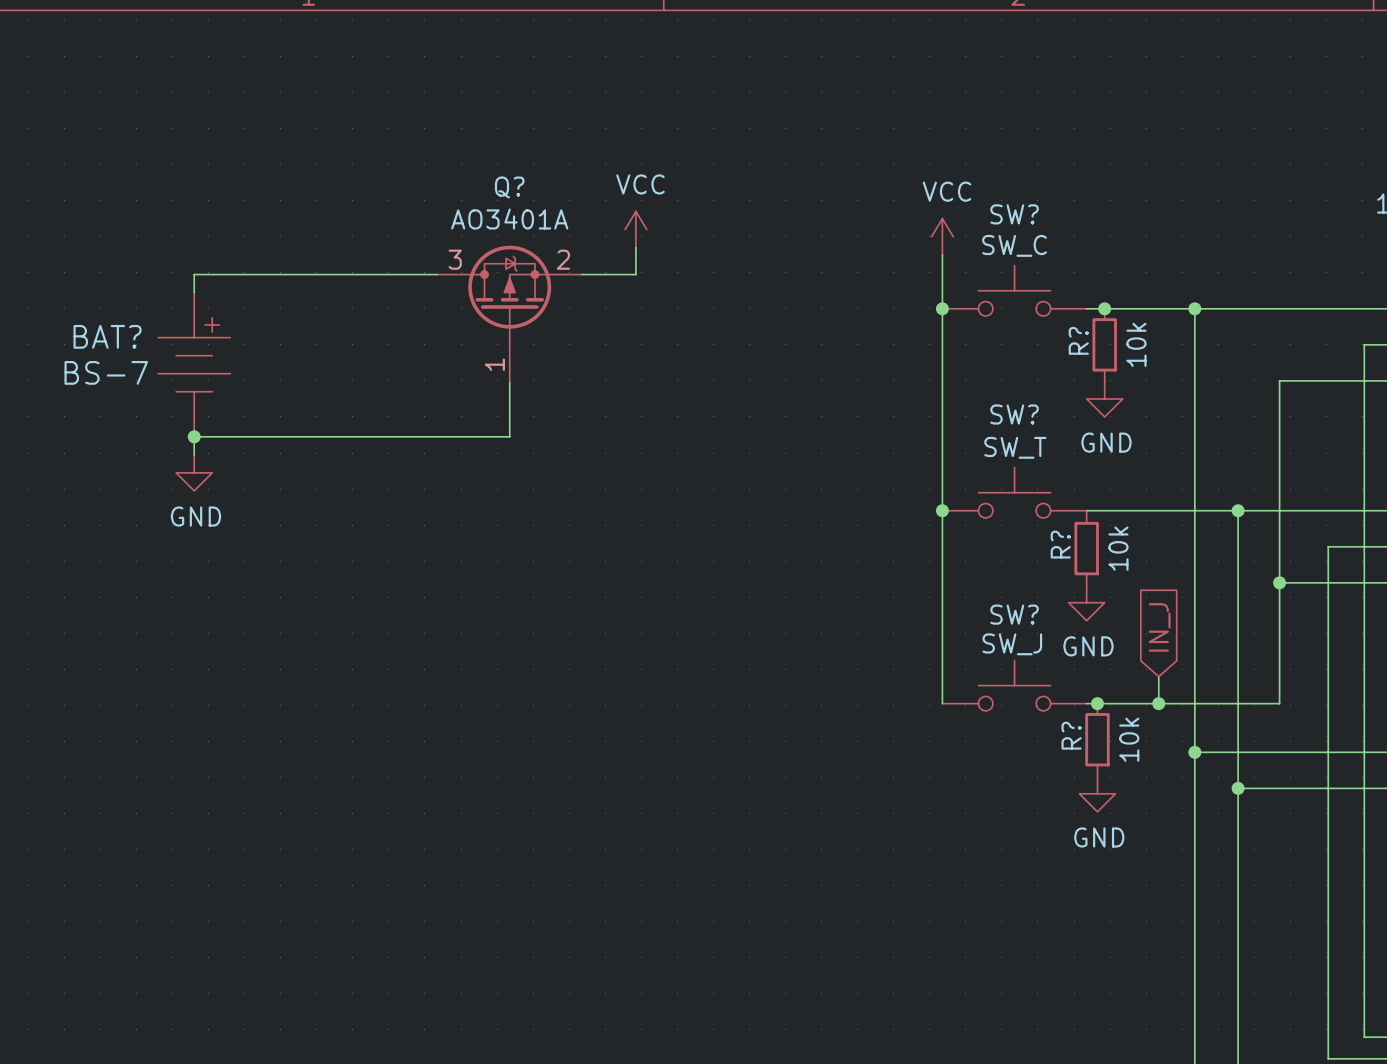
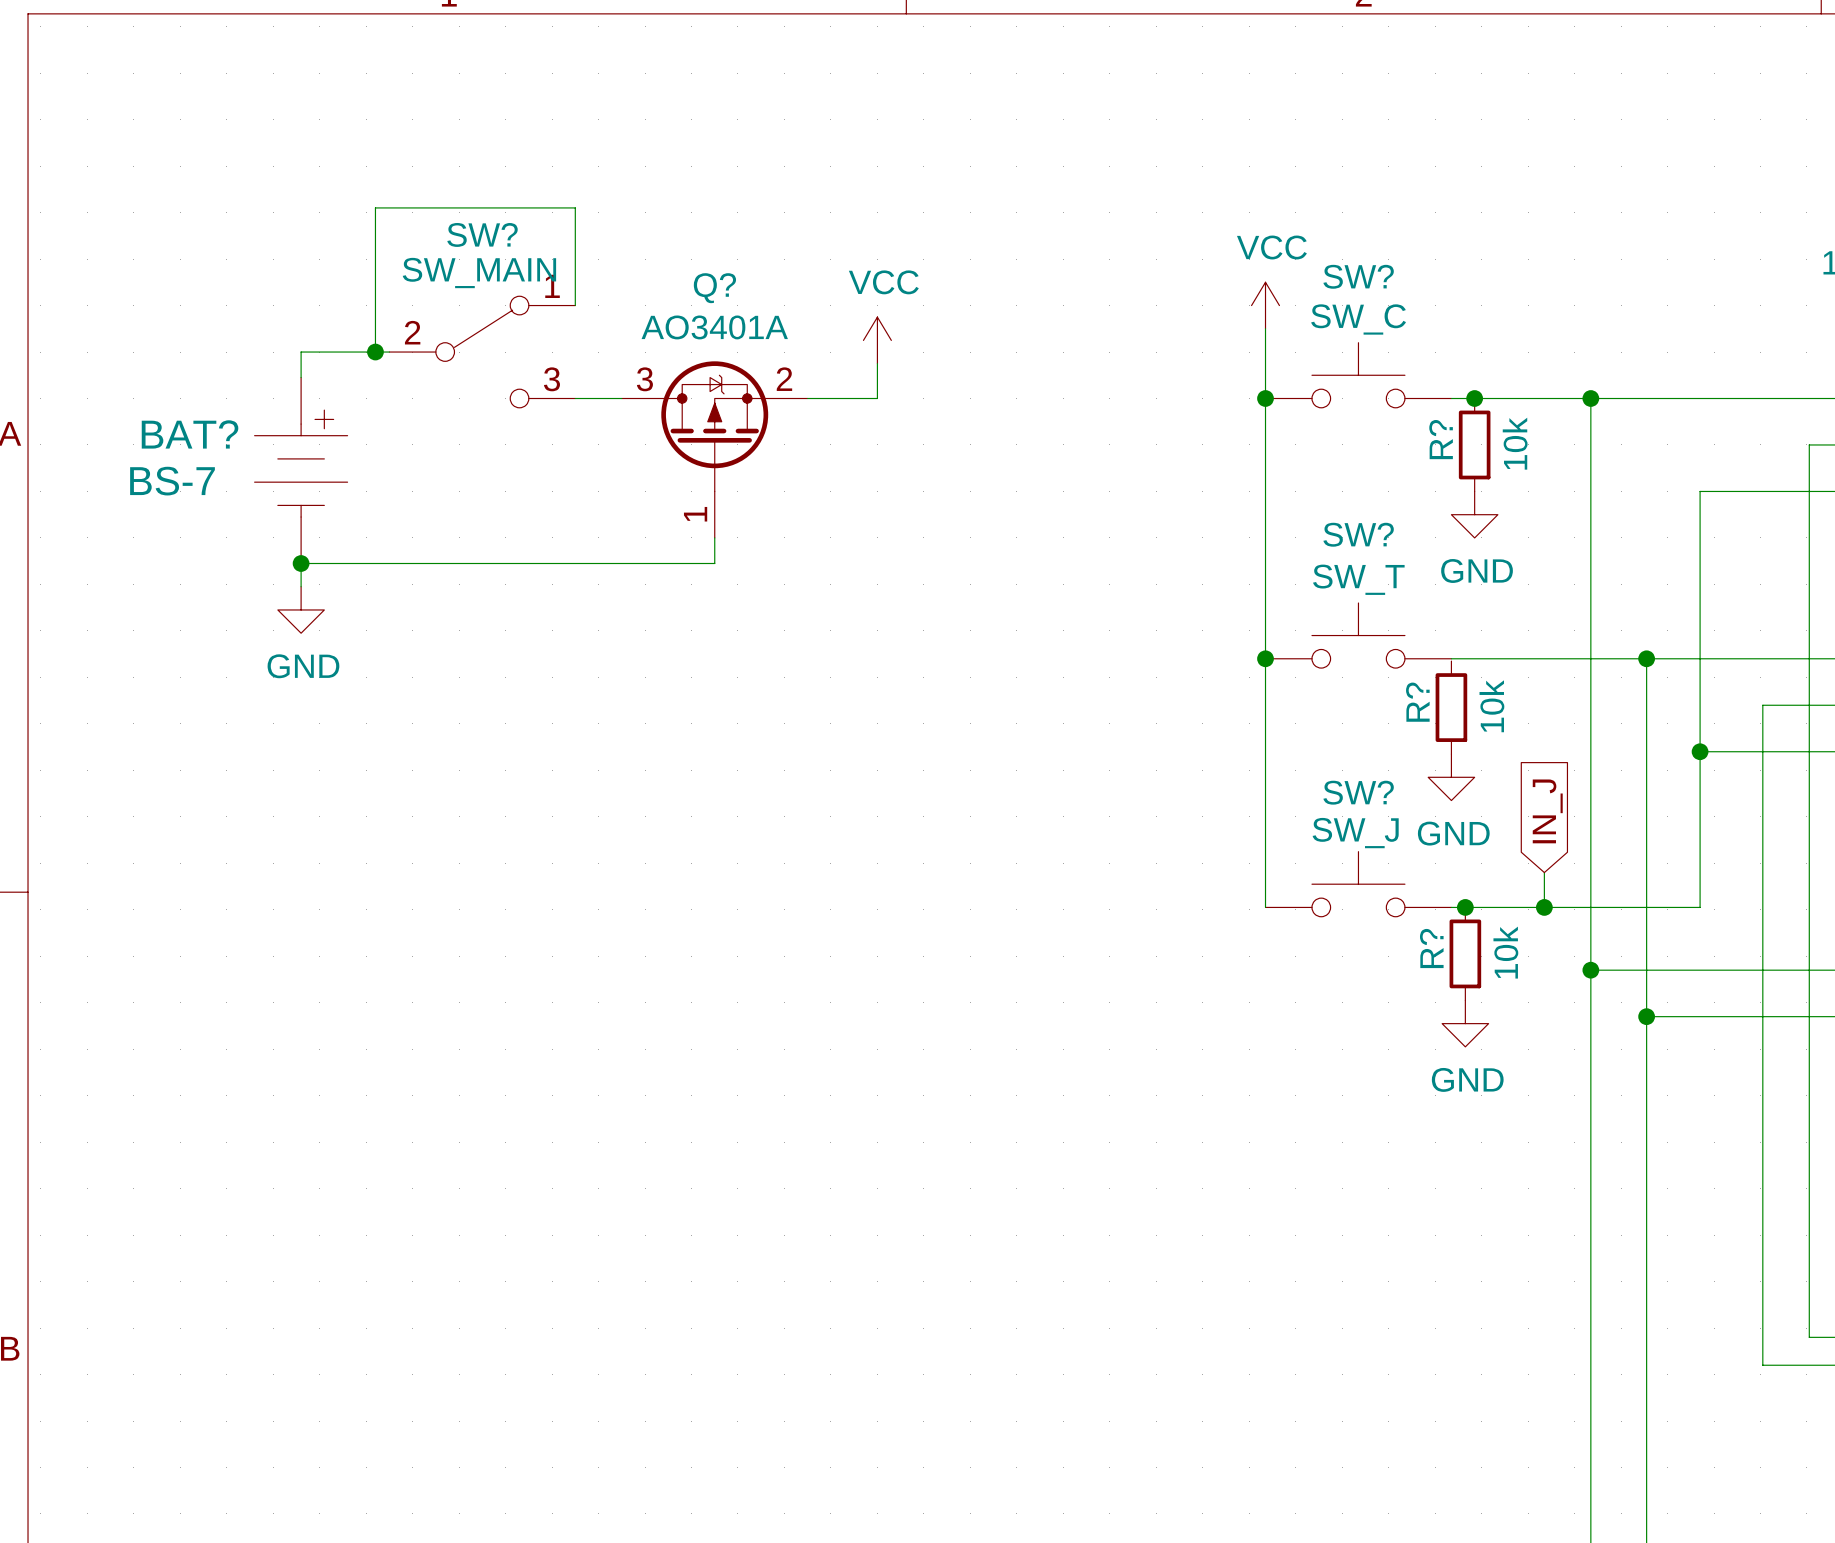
power symbol position: VCC (635, 229) -> VCC (877, 340)
wire: none -> (575, 305) (575, 207) (375, 207) (375, 352)
wire: (635, 247) (635, 274) (581, 274) -> (877, 363) (877, 398) (807, 398)
junction: none -> (375, 352)
SW?: none -> SW_MAIN (482, 352)
wire: (194, 274) (437, 274) -> (301, 354) (301, 352) (389, 352)
wire: none -> (575, 398) (621, 398)
Q? position: (509, 314) -> (714, 449)
wire: (509, 382) (509, 436) -> (714, 537) (714, 563) (707, 563)

